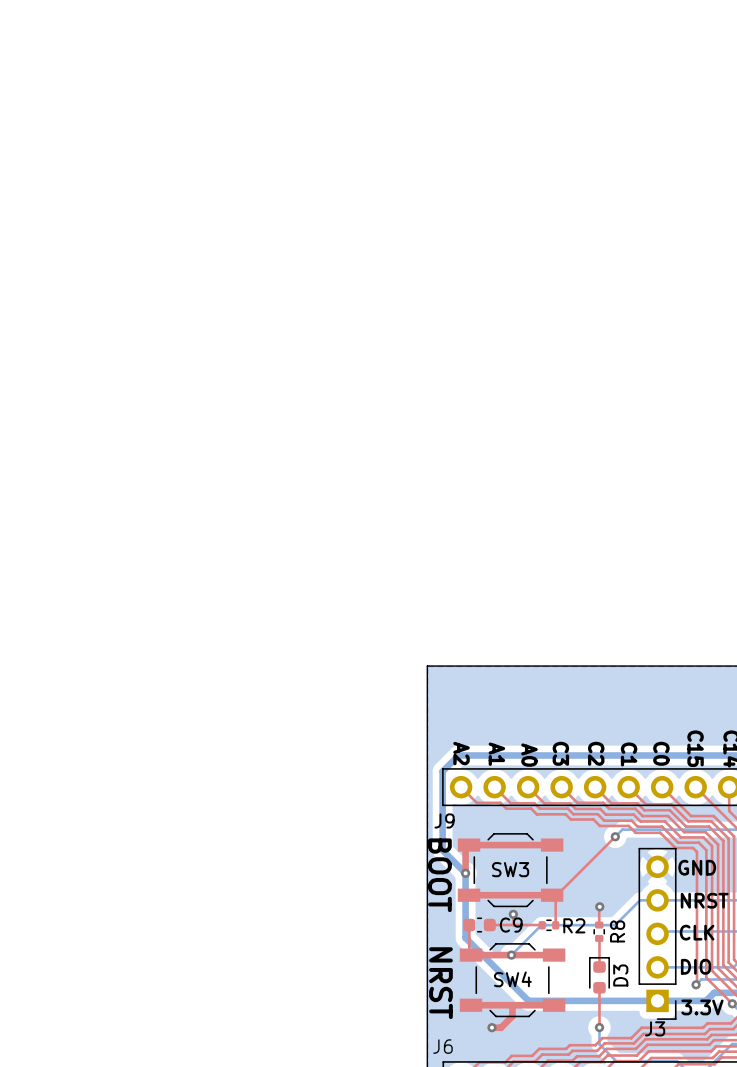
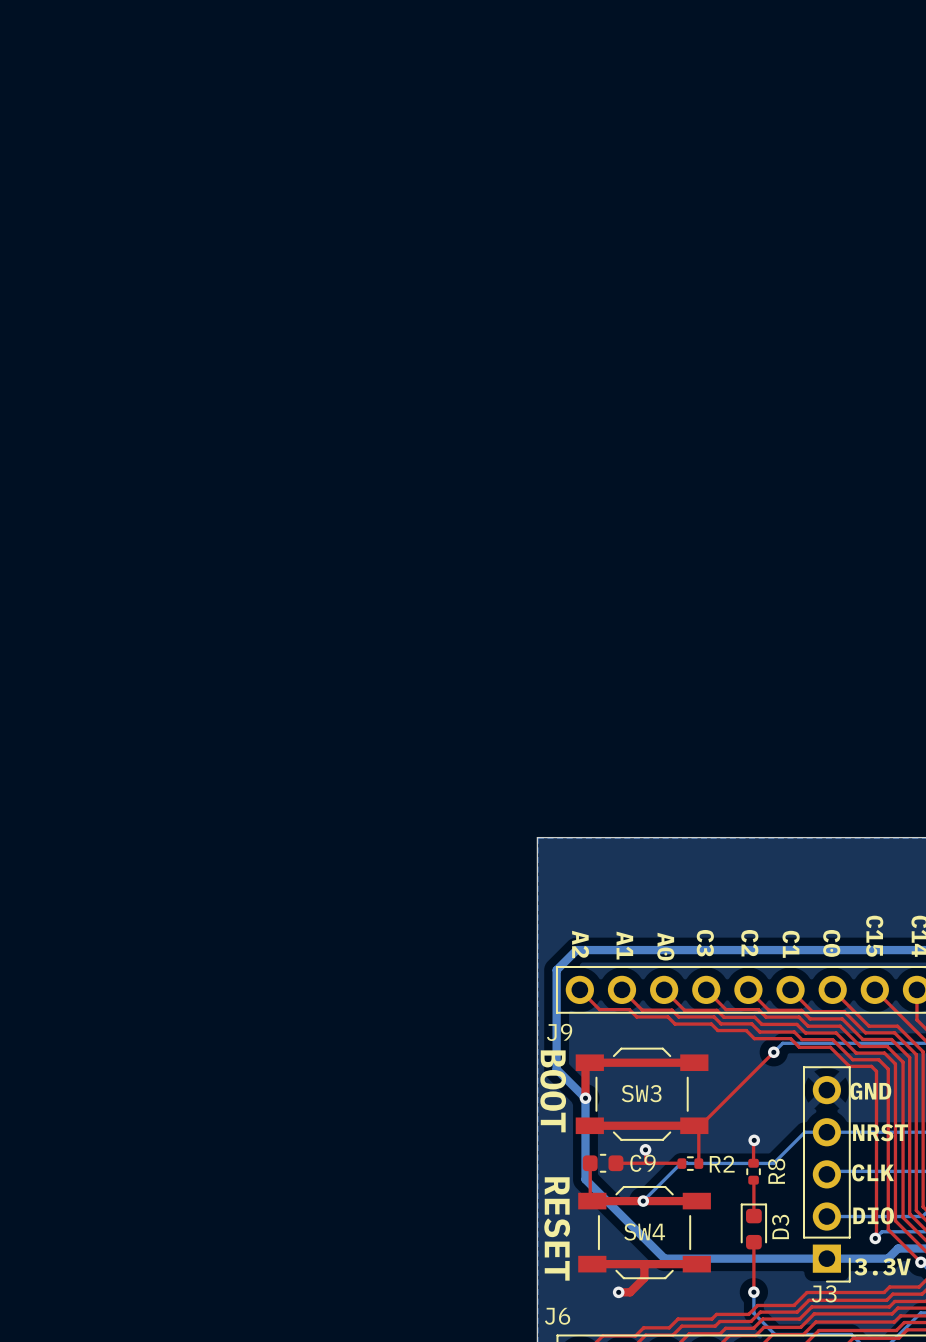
text: NRST (440, 983) -> RESET (557, 1228)

